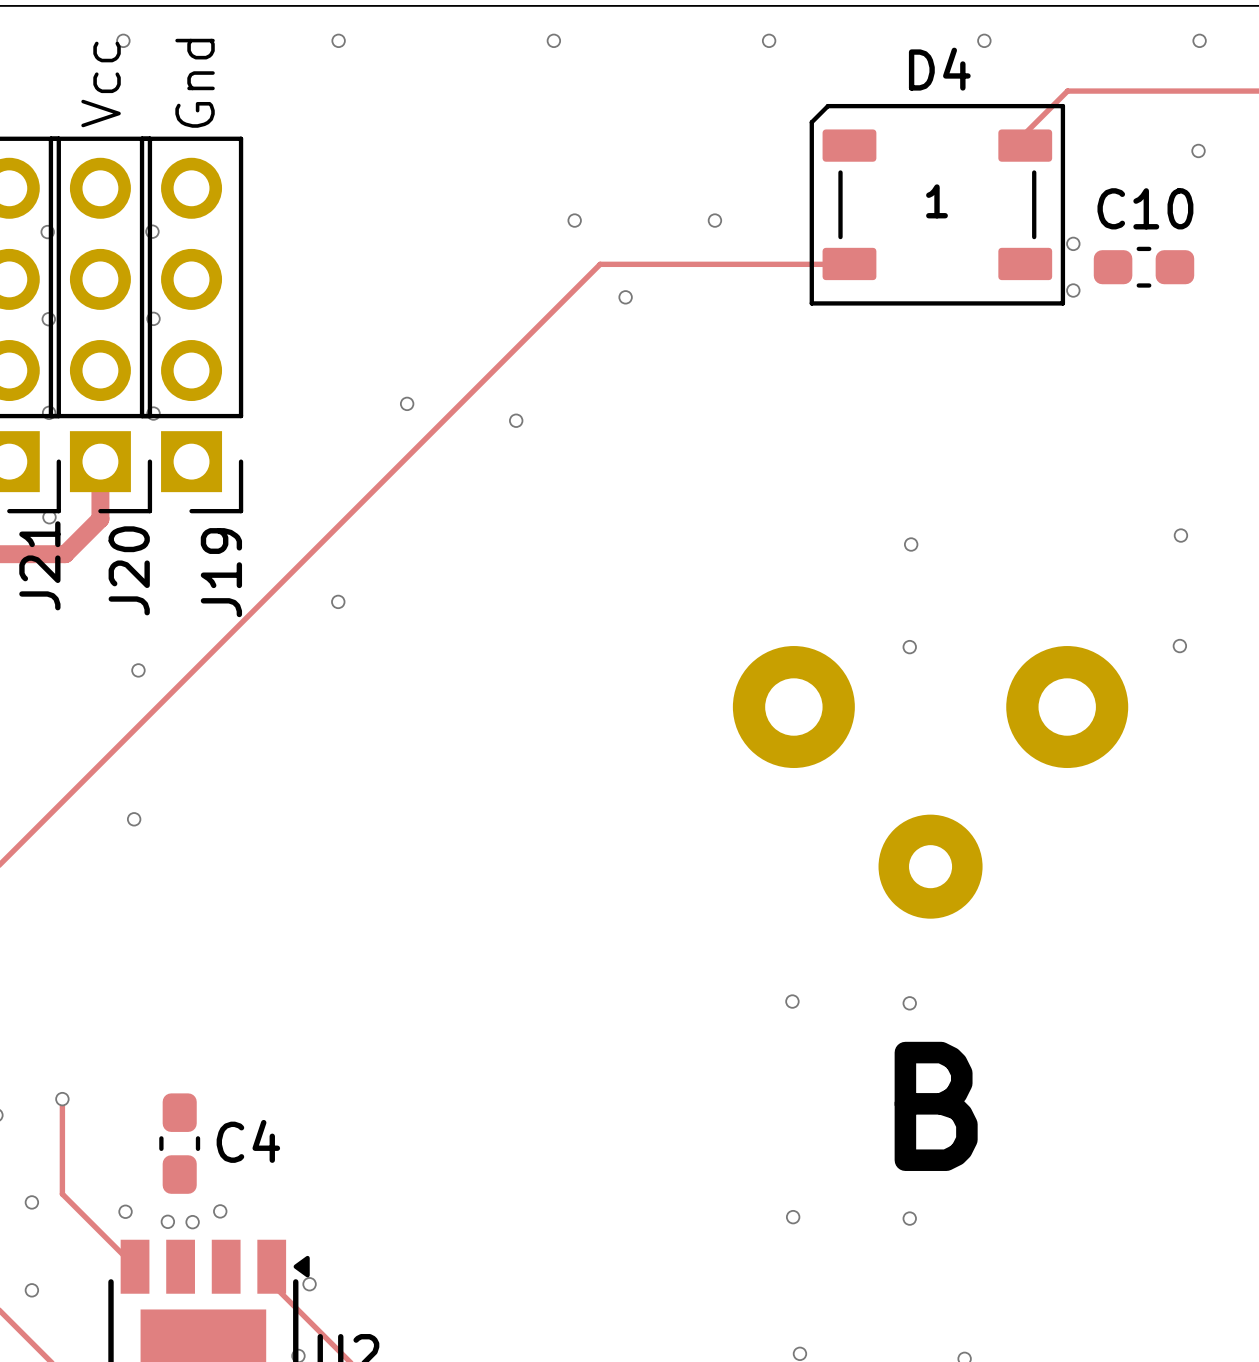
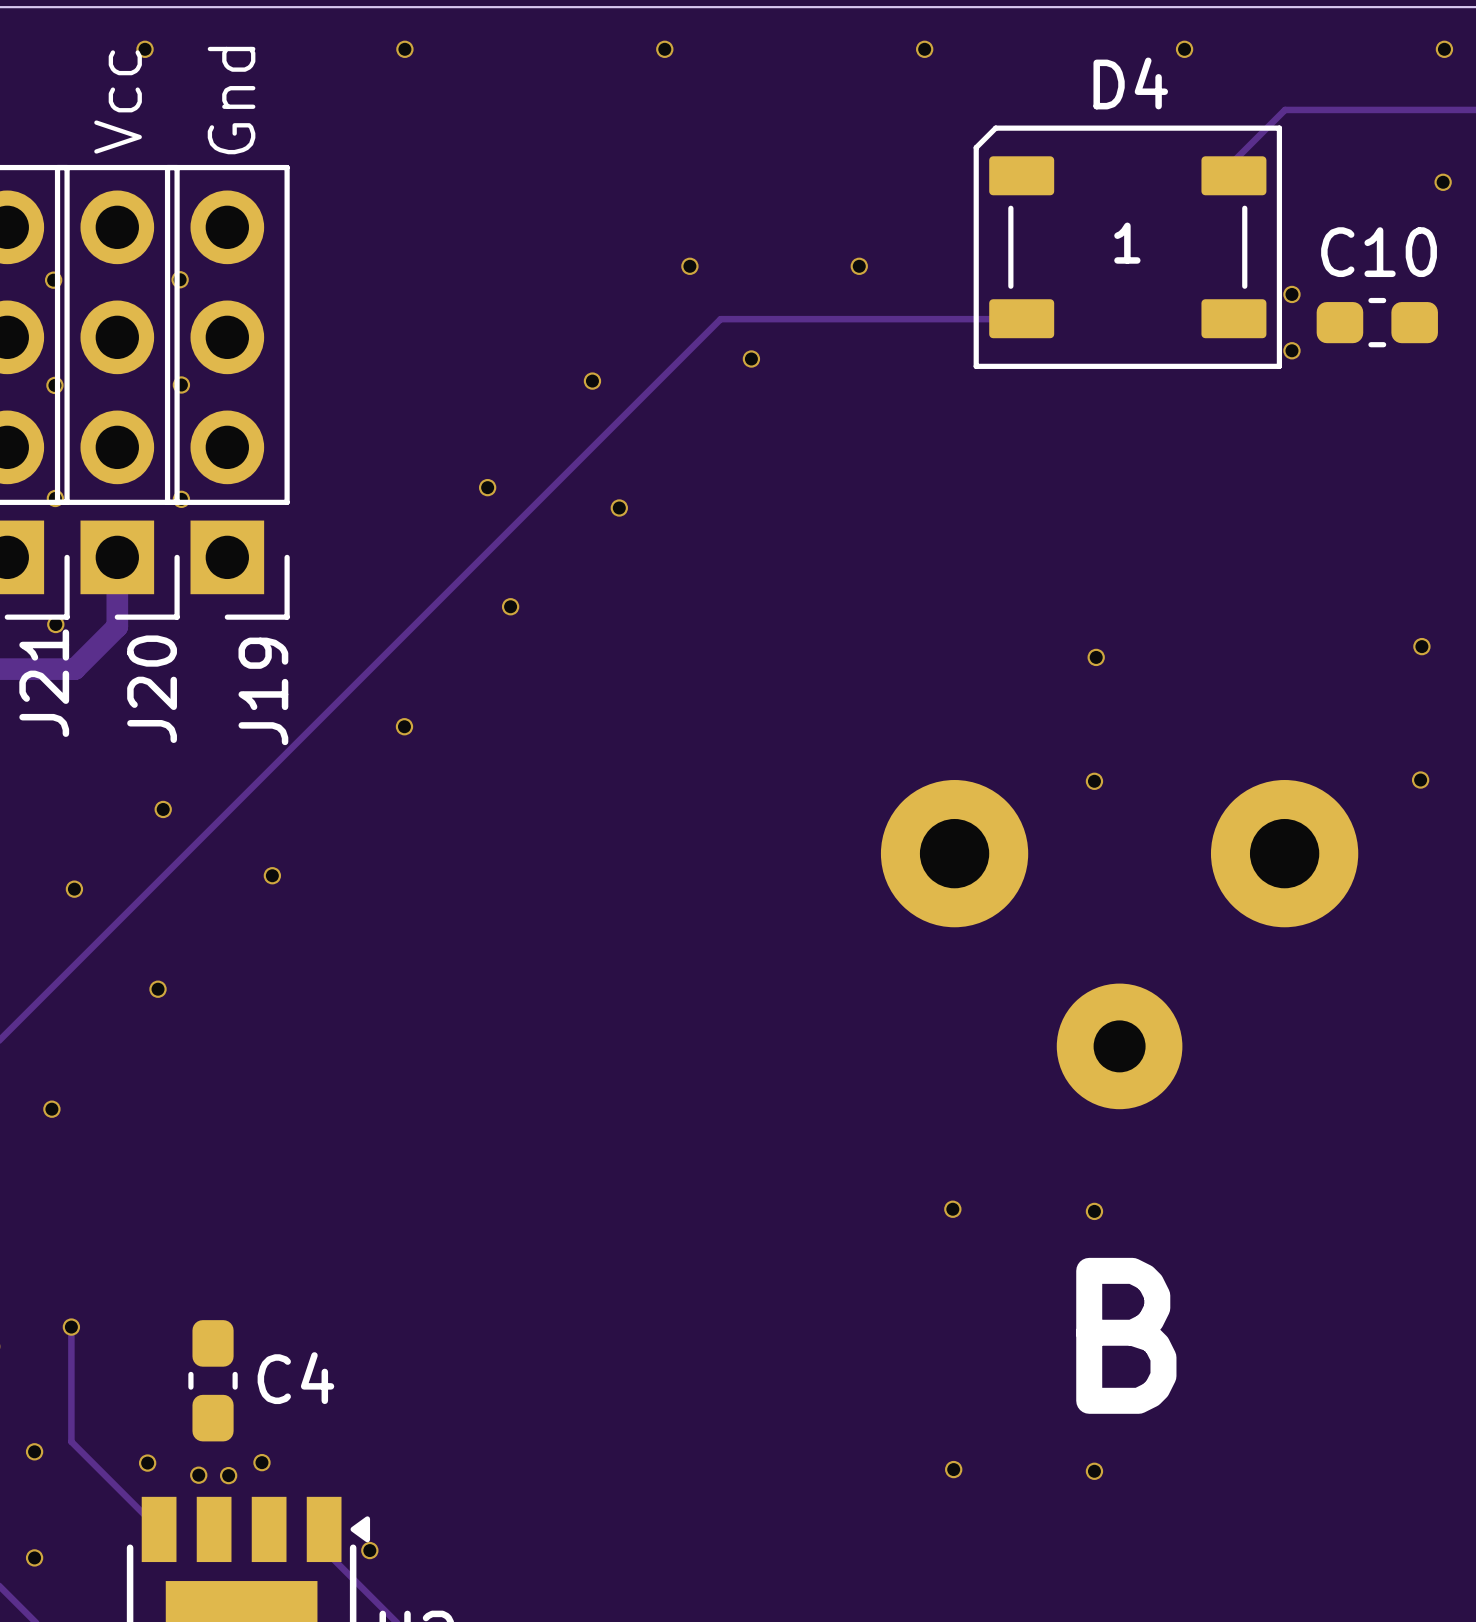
via: none -> (592, 381)
via: none -> (510, 606)
via: none -> (272, 875)
via: none -> (74, 889)
via: none -> (51, 1109)

